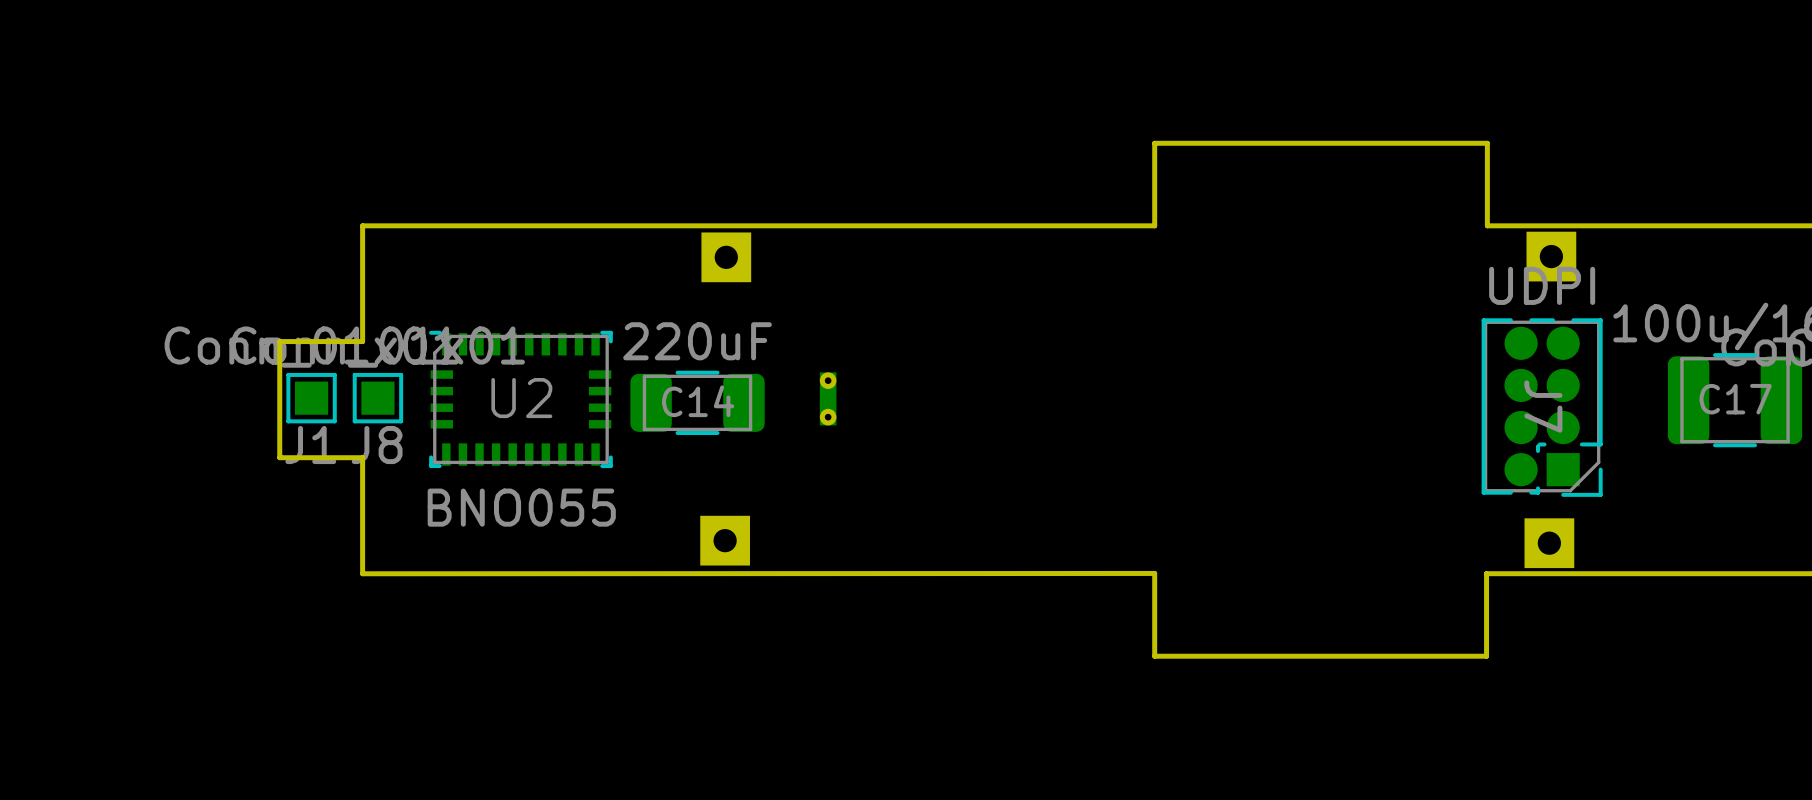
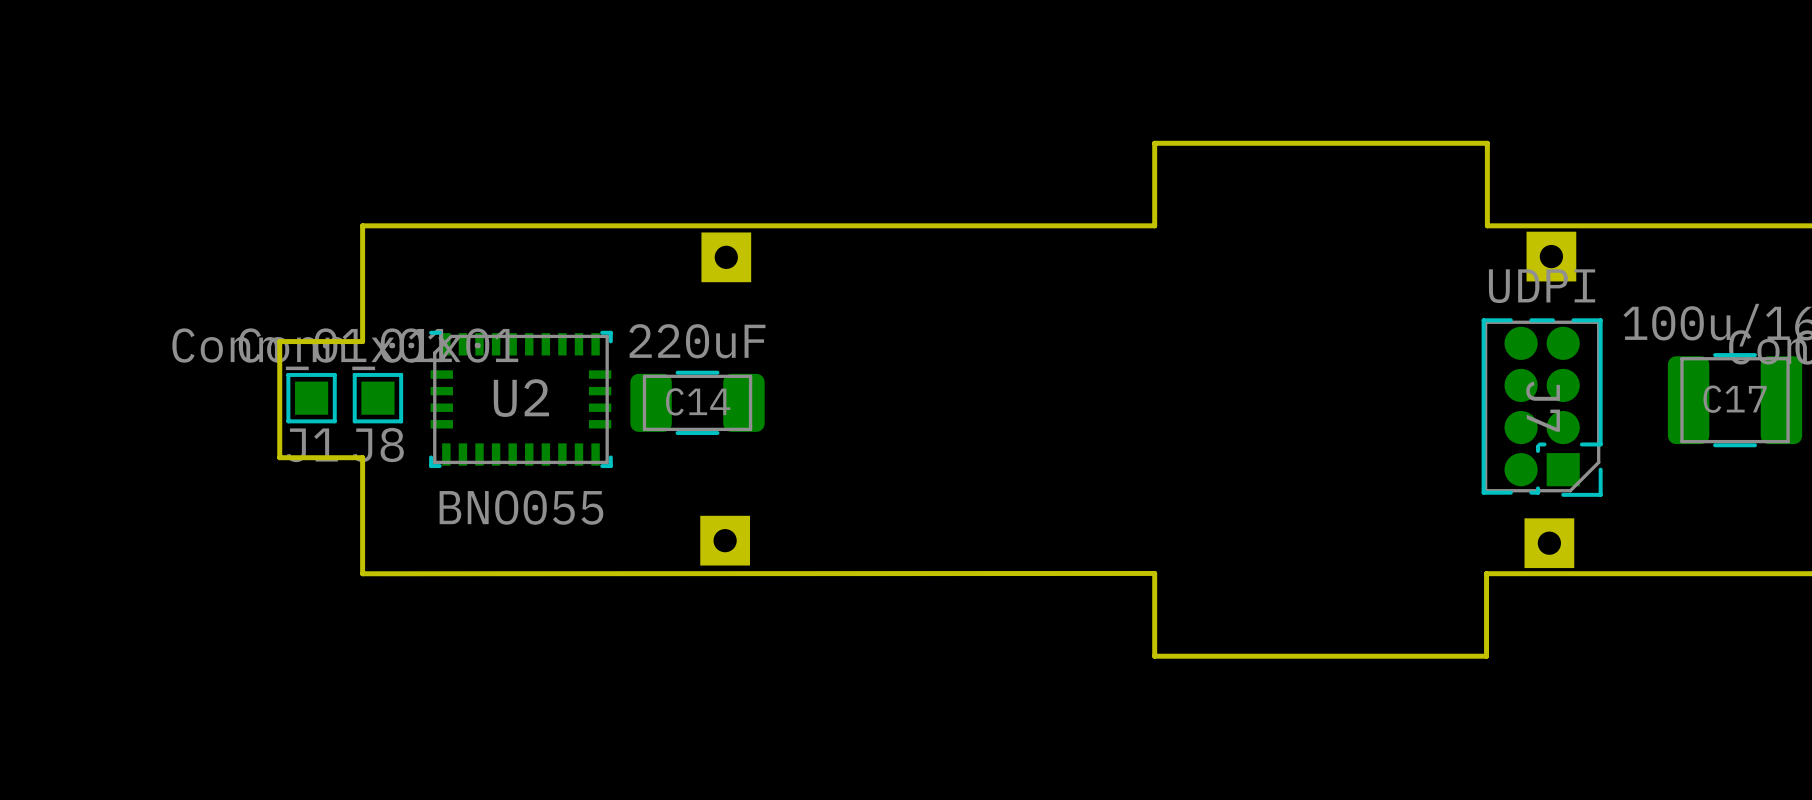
part: (828, 398) -> none

